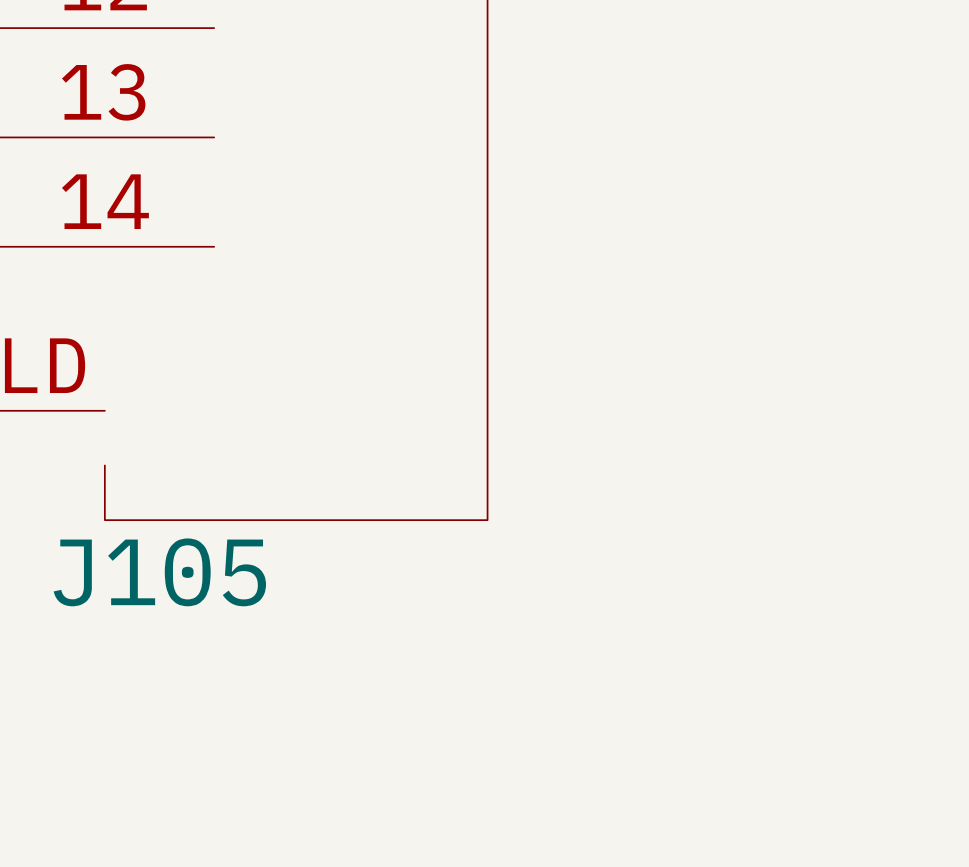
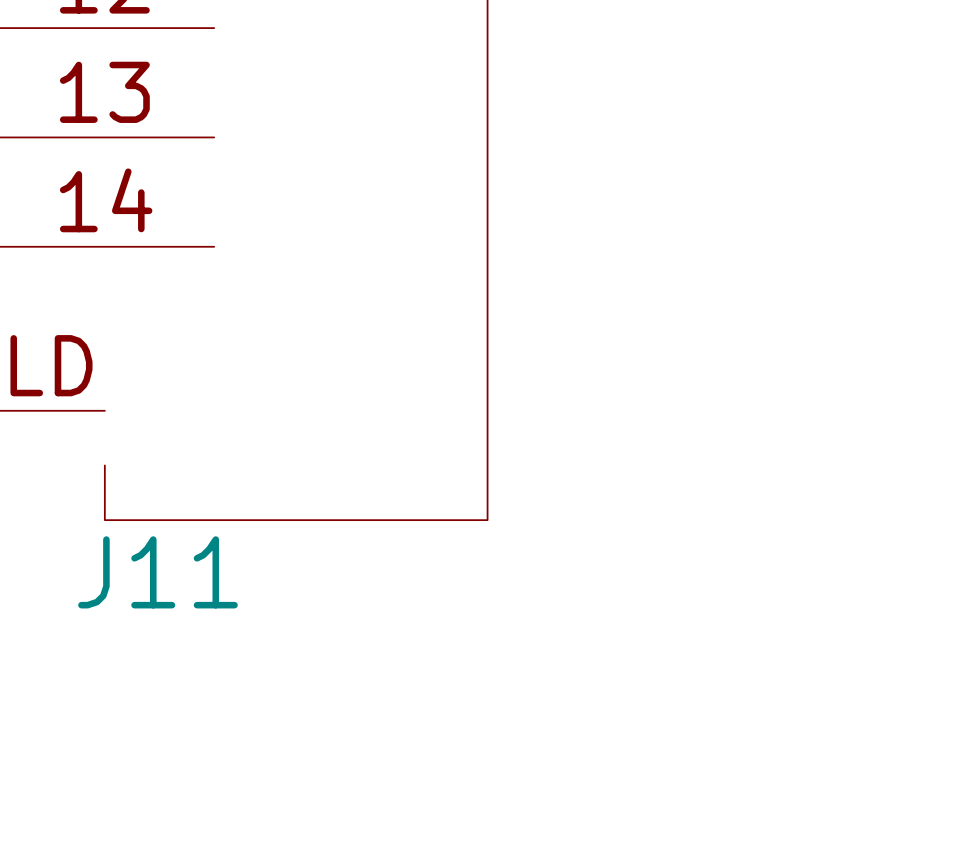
J105 name: J105 (159, 572) -> J11 (157, 572)

